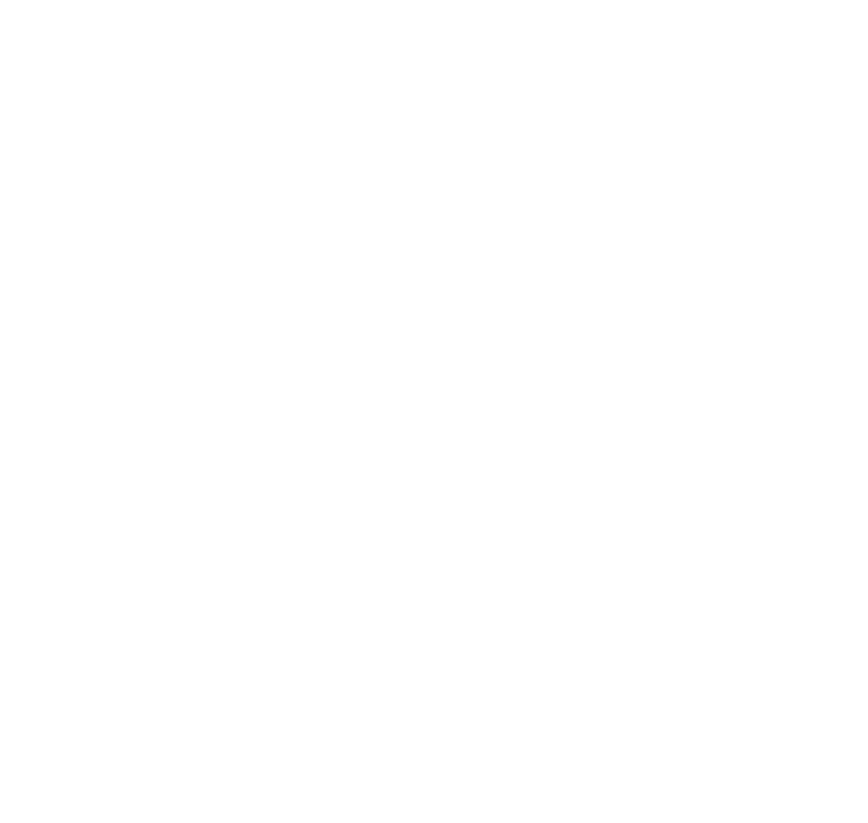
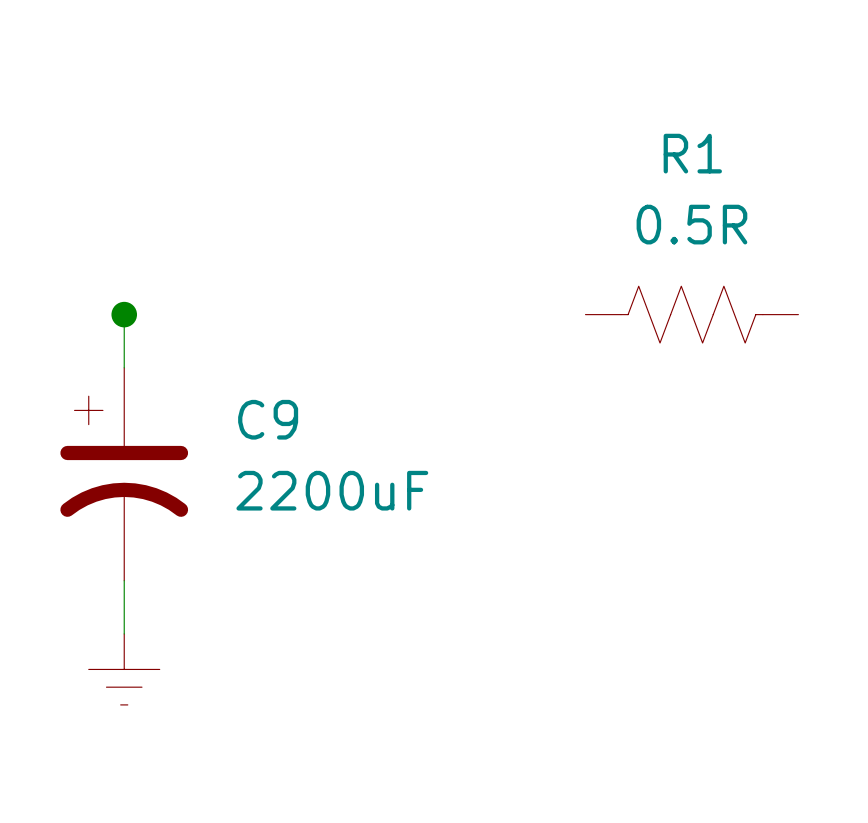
wire: none -> (124, 314) (124, 367)
junction: none -> (124, 314)
R1: none -> 0.5R (691, 314)
C9: none -> 2200uF (124, 474)
wire: none -> (124, 580) (124, 633)
power symbol: none -> (124, 669)

